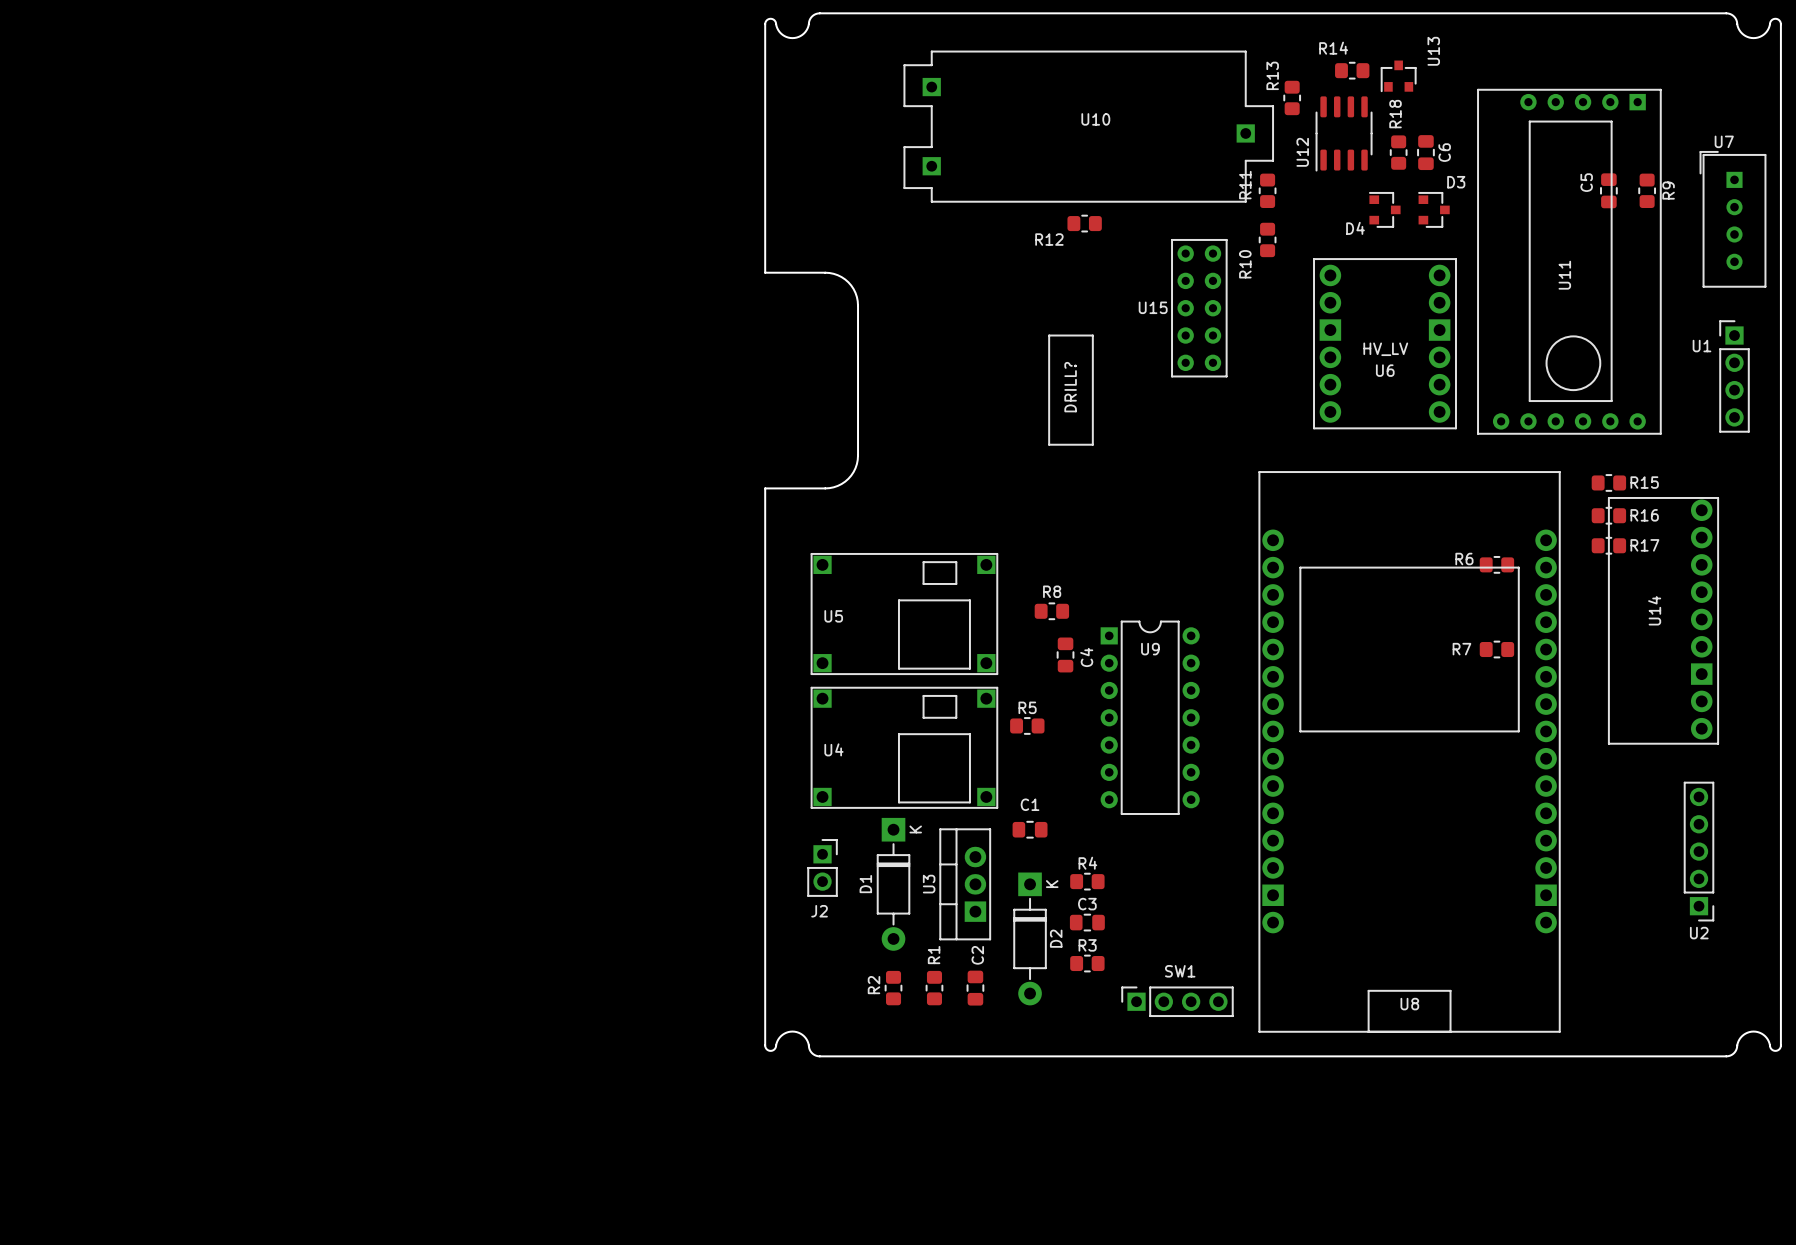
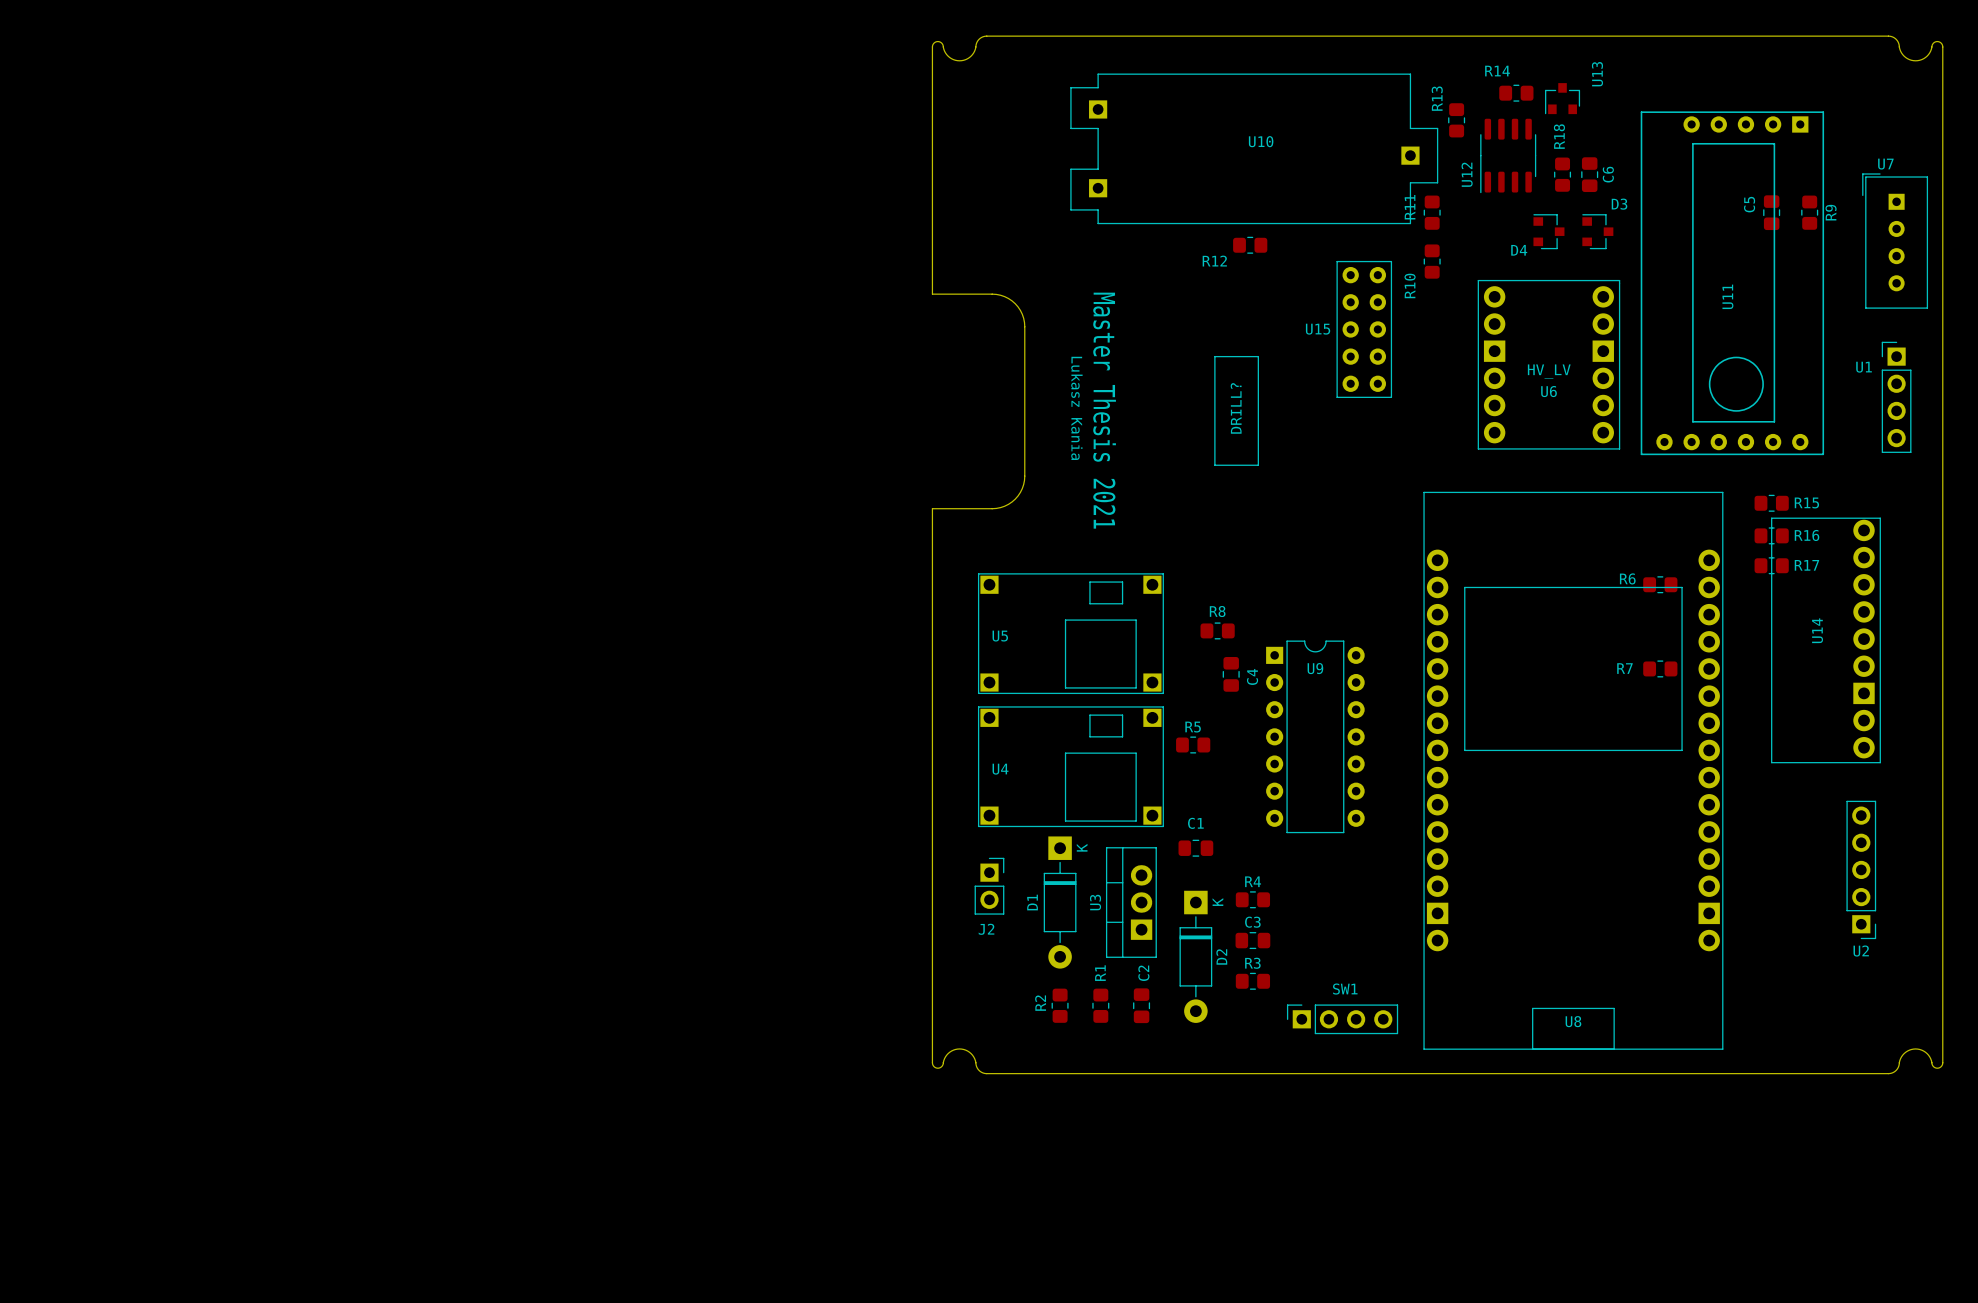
text: none -> Lukasz Kania (1076, 408)
text: none -> Master Thesis 2021 (1104, 410)

